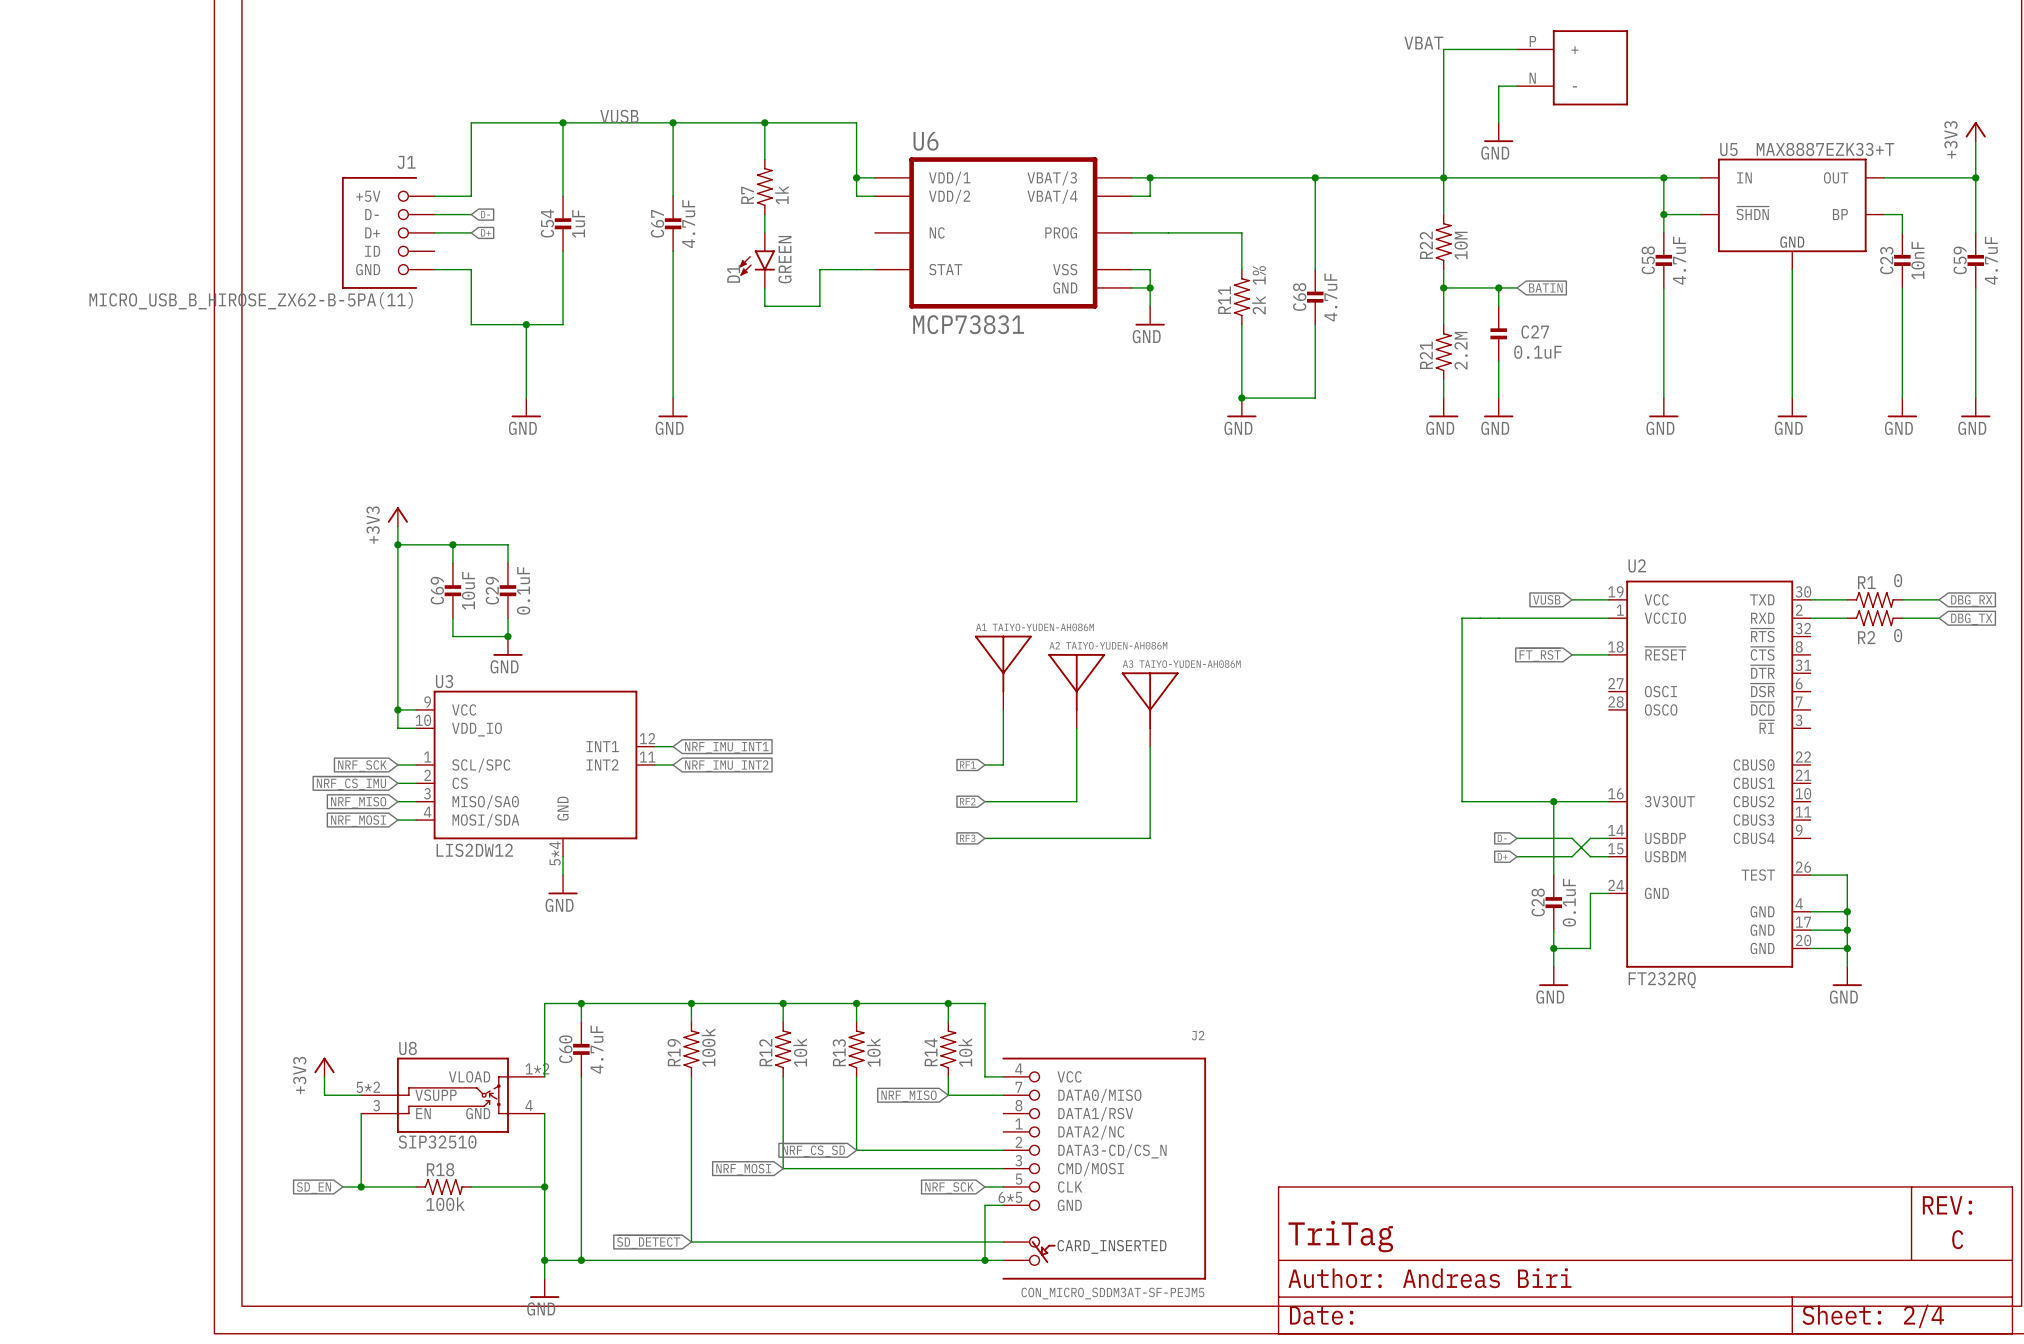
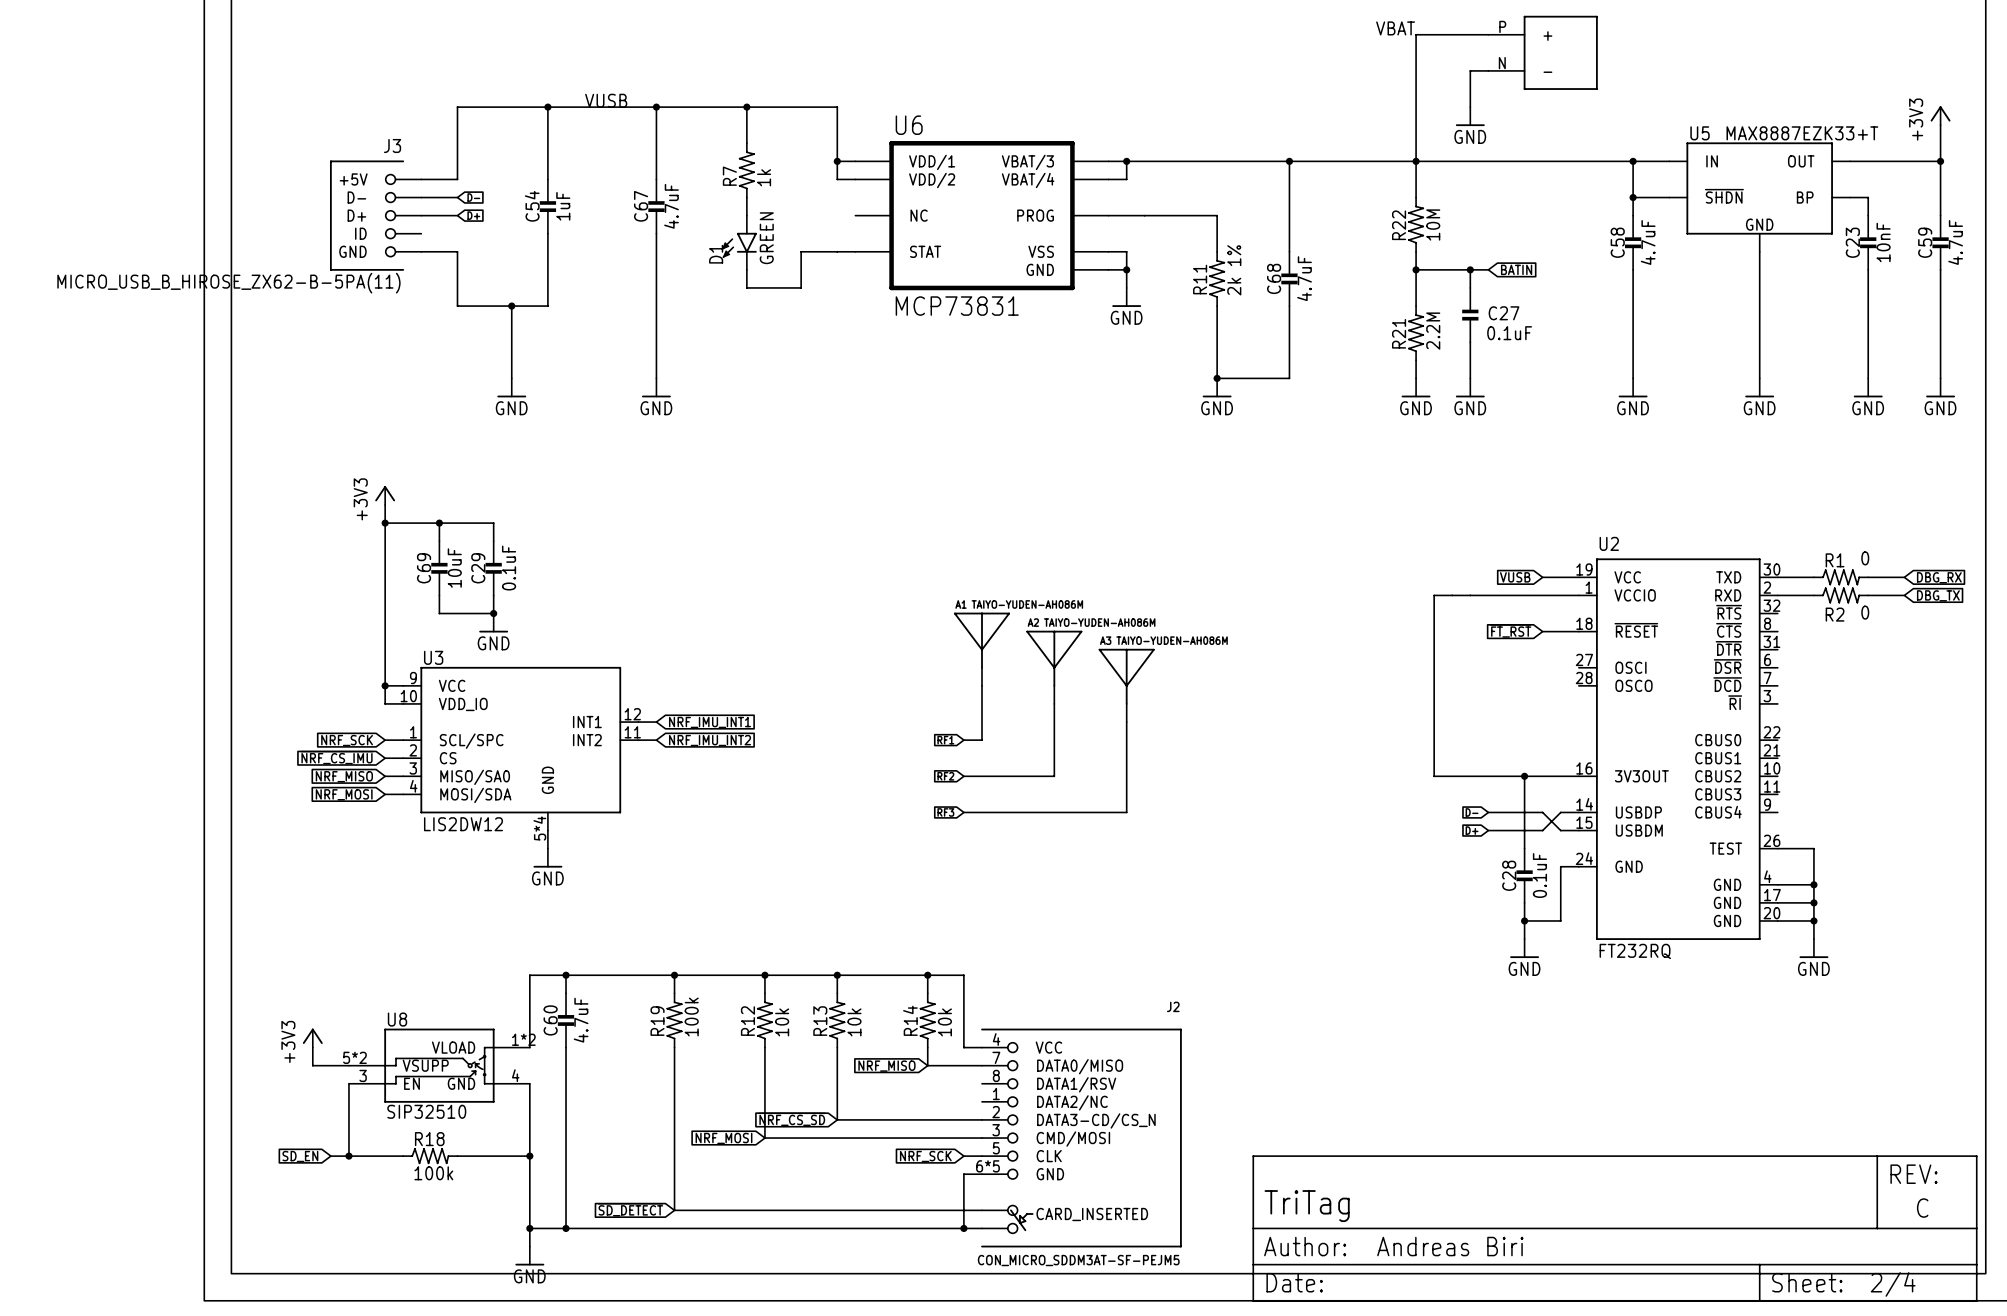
J1 name: J1 (406, 162) -> J3 (392, 145)

